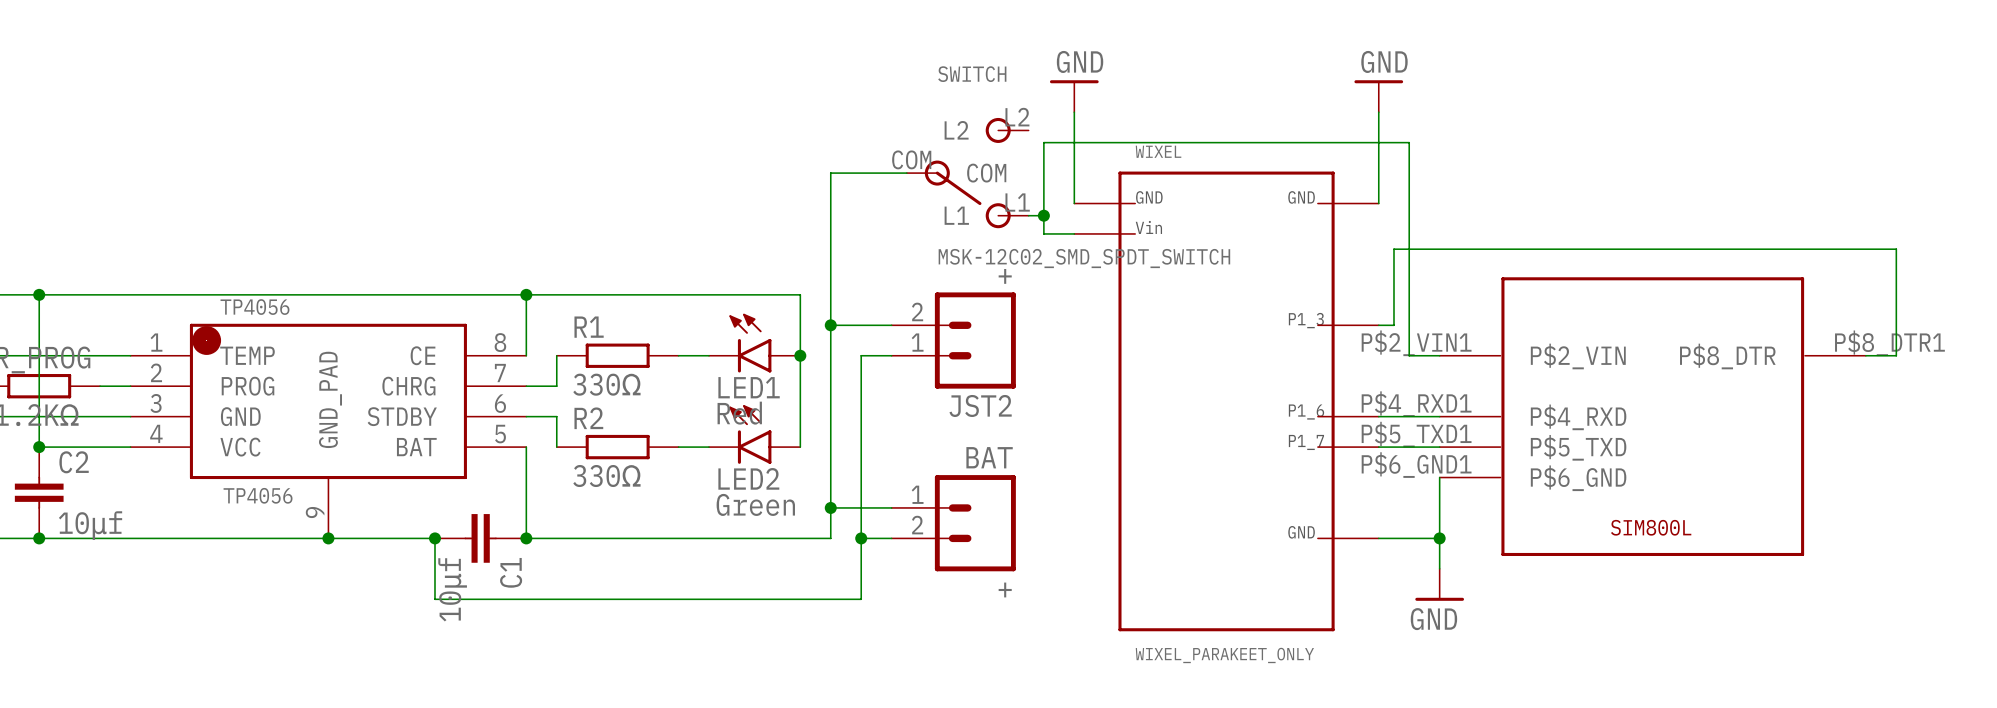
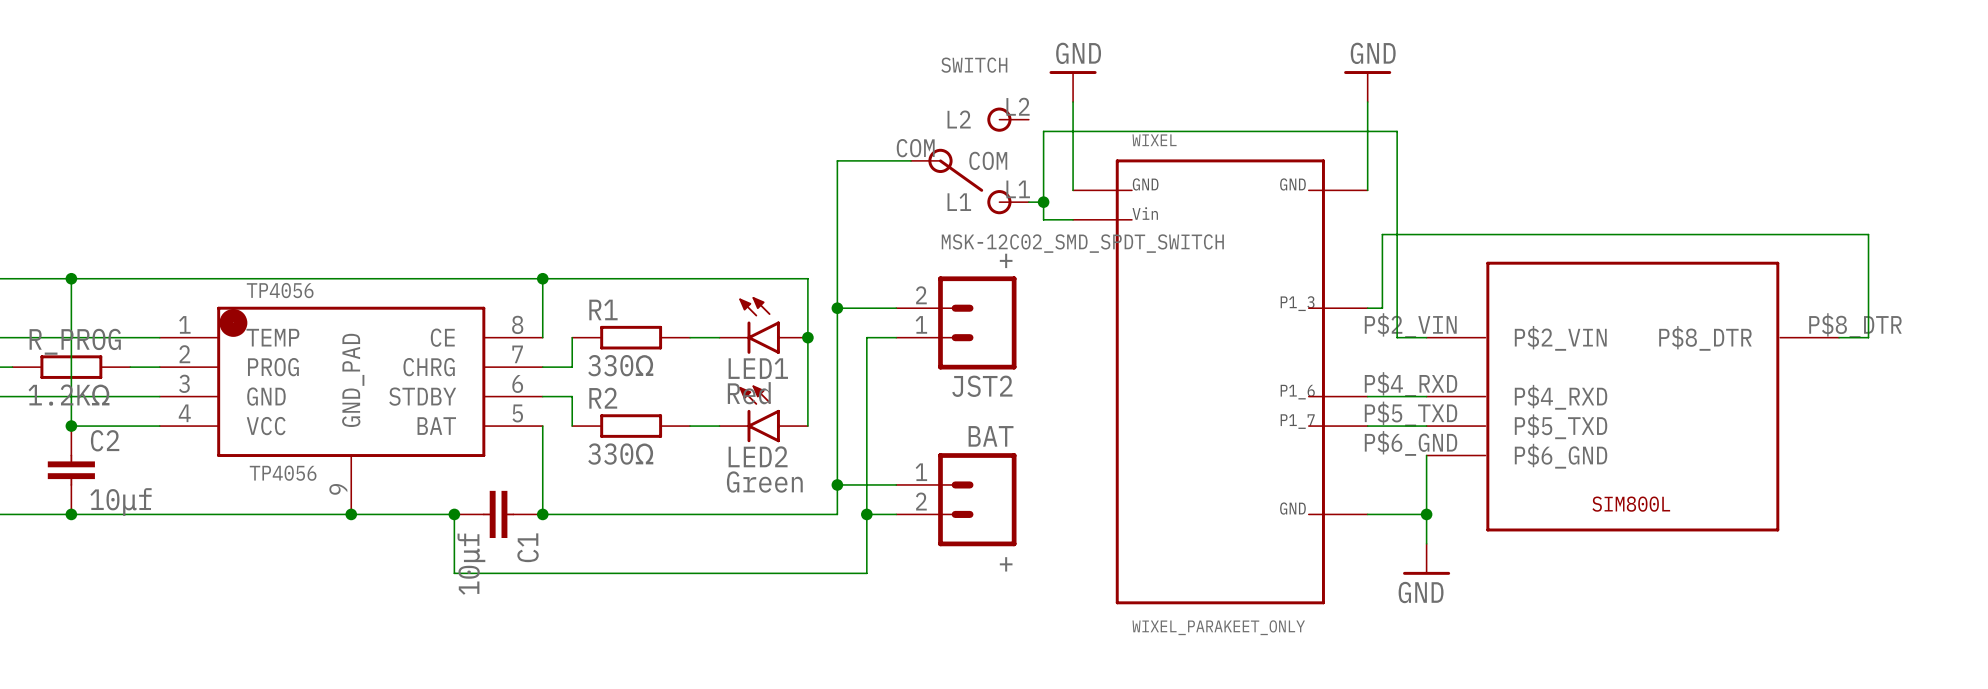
part pin number: P$2_VIN1 (1416, 343) -> P$2_VIN (1410, 325)
part pin number: P$8_DTR1 (1889, 343) -> P$8_DTR (1855, 325)
part pin number: P$4_RXD1 (1416, 404) -> P$4_RXD (1411, 384)
part pin number: P$5_TXD1 (1416, 434) -> P$5_TXD (1411, 414)
part pin number: P$6_GND1 (1416, 465) -> P$6_GND (1411, 443)

